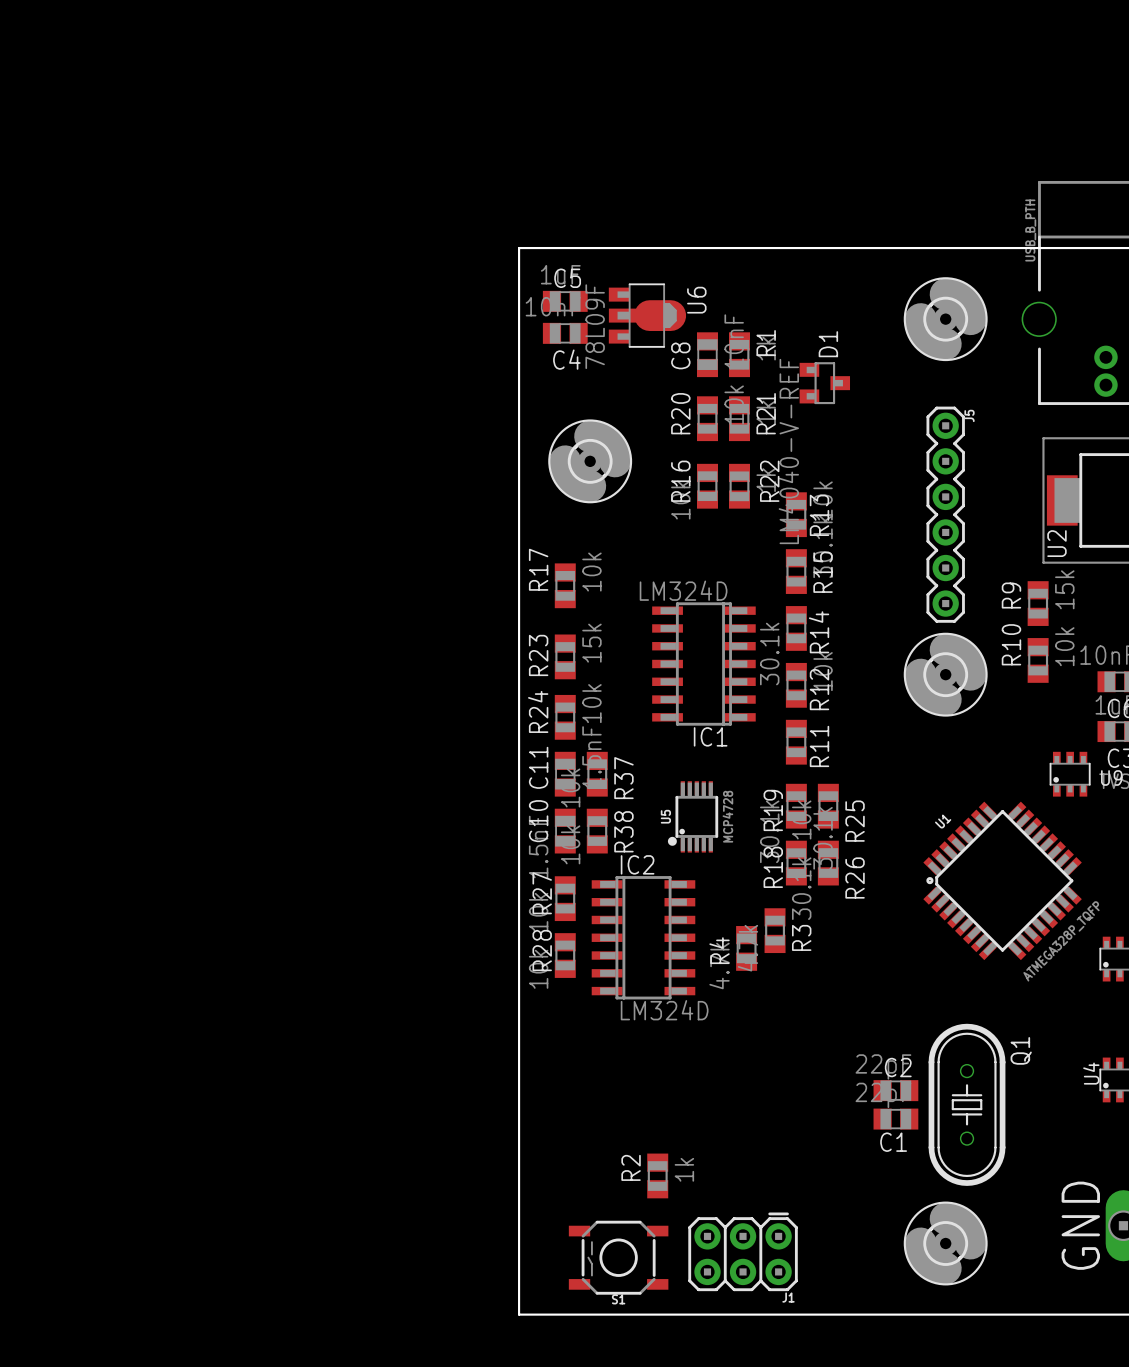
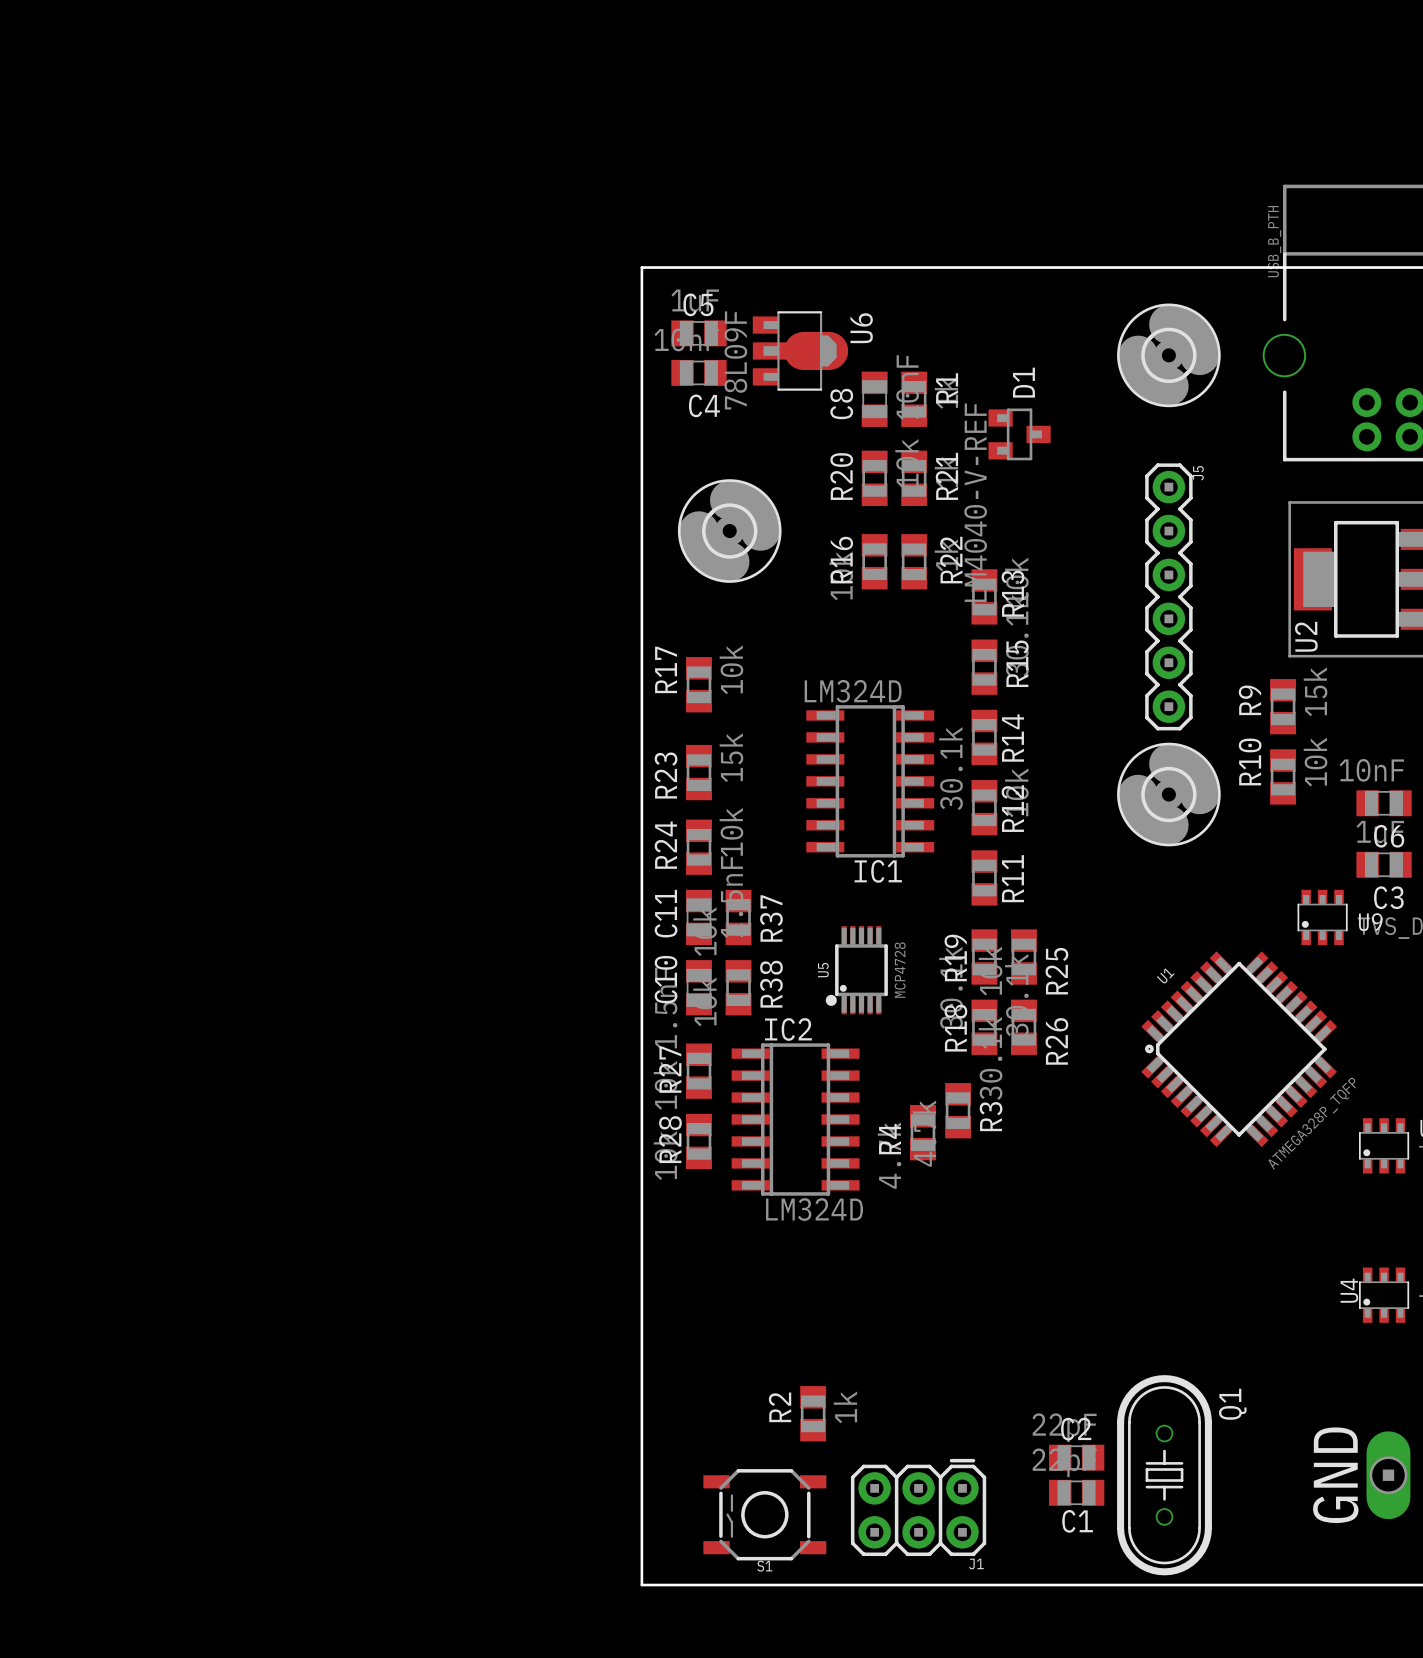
C2 position: (895, 1090) -> (1076, 1457)
Q1 position: (967, 1104) -> (1164, 1475)
C1 position: (895, 1119) -> (1076, 1492)
part: (945, 1243) -> none

